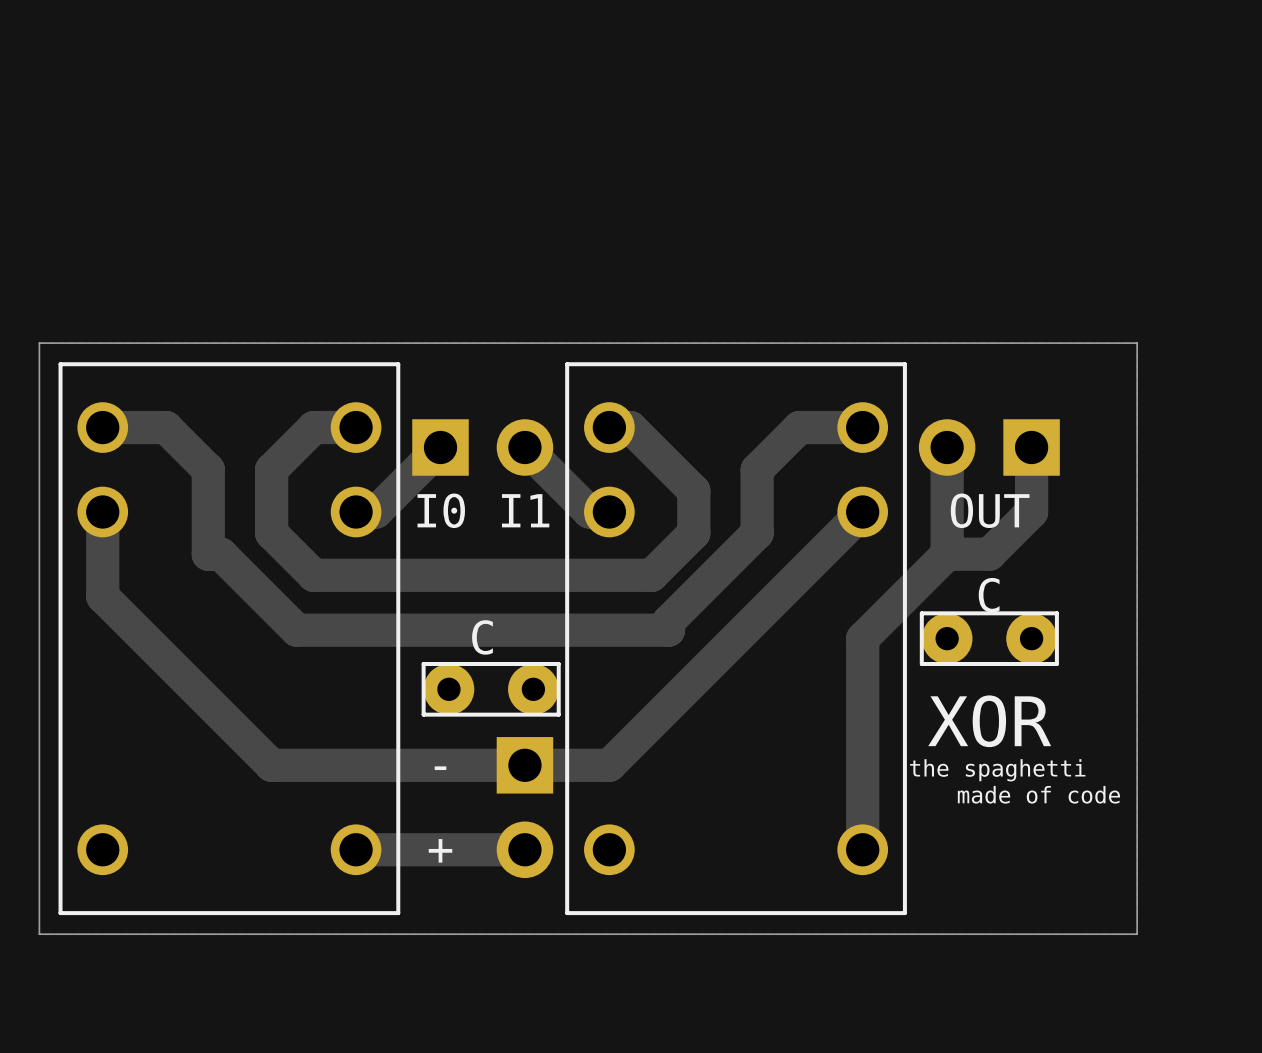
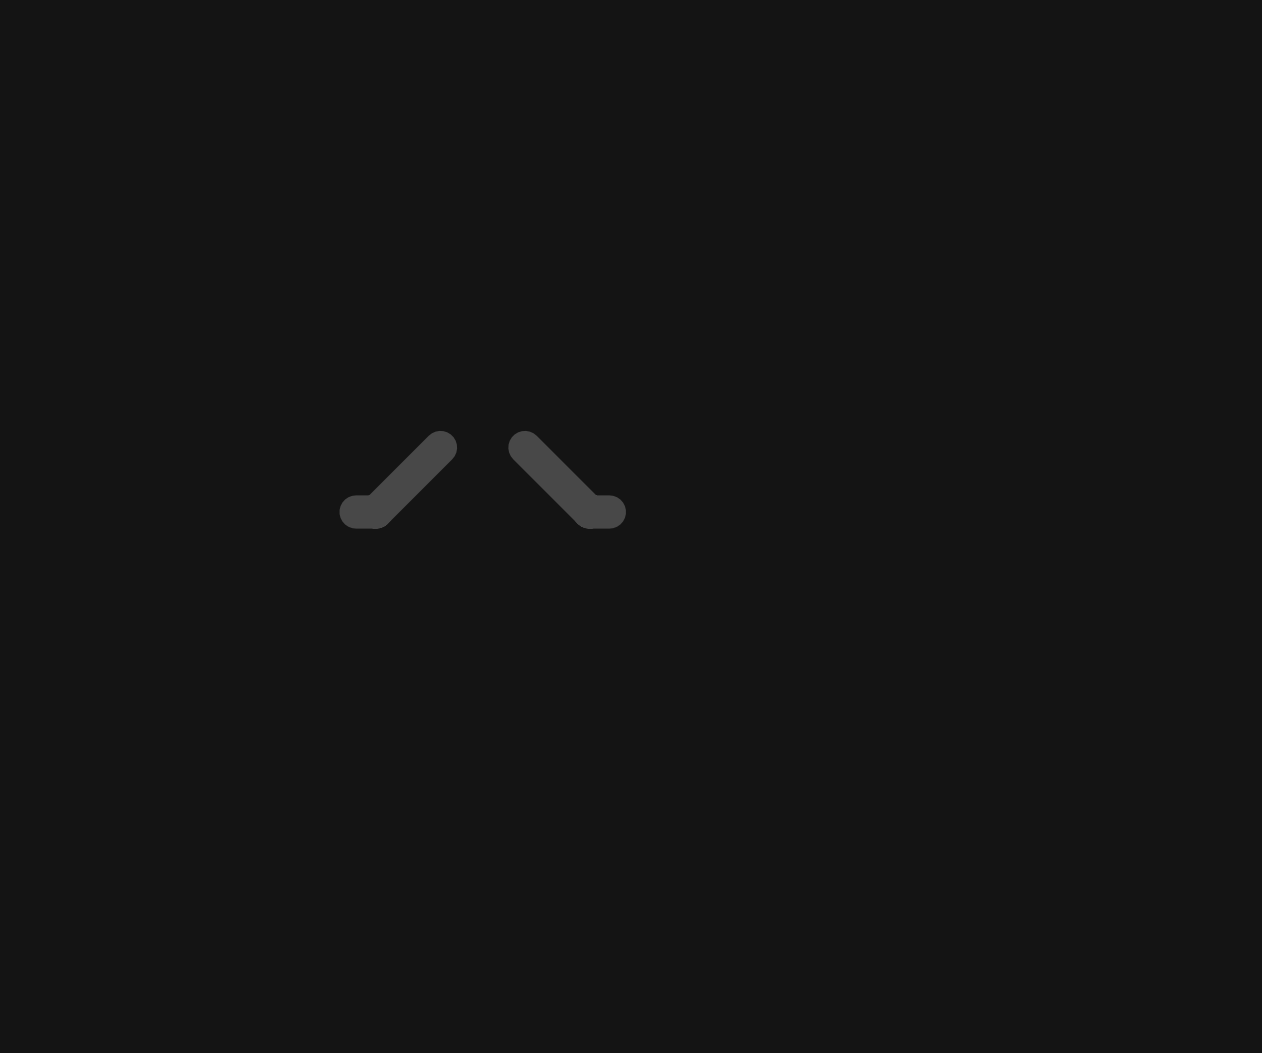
board edge: (39, 343) (39, 934) (1137, 934) (1137, 343) (39, 343) -> none
track: (102, 427) (166, 427) (208, 469) (208, 554) (220, 554) (296, 630) (668, 630) (668, 621) (757, 533) (757, 469) (799, 427) (862, 427) -> none
track: (356, 427) (313, 427) (271, 469) (271, 533) (313, 575) (651, 575) (693, 533) (693, 490) (630, 427) (609, 427) -> none
part: (482, 447) -> none
track: (947, 447) (947, 554) -> none
part: (989, 447) -> none
track: (1031, 447) (1031, 511) (989, 554) (947, 554) -> none
text: I0 (441, 510) -> none
text: I1 (525, 510) -> none
text: OUT (990, 510) -> none
track: (102, 511) (102, 596) (271, 765) (609, 765) (862, 511) -> none
track: (947, 554) (862, 638) (862, 849) -> none
text: C (989, 595) -> none
text: C (482, 637) -> none
part: (229, 638) -> none
part: (736, 638) -> none
part: (989, 638) -> none
part: (491, 689) -> none
text: XOR (989, 721) -> none
text: - (440, 768) -> none
text: the spaghetti (997, 770) -> none
text: made of code (1038, 794) -> none
part: (524, 807) -> none
track: (356, 849) (524, 849) -> none
text: + (440, 850) -> none

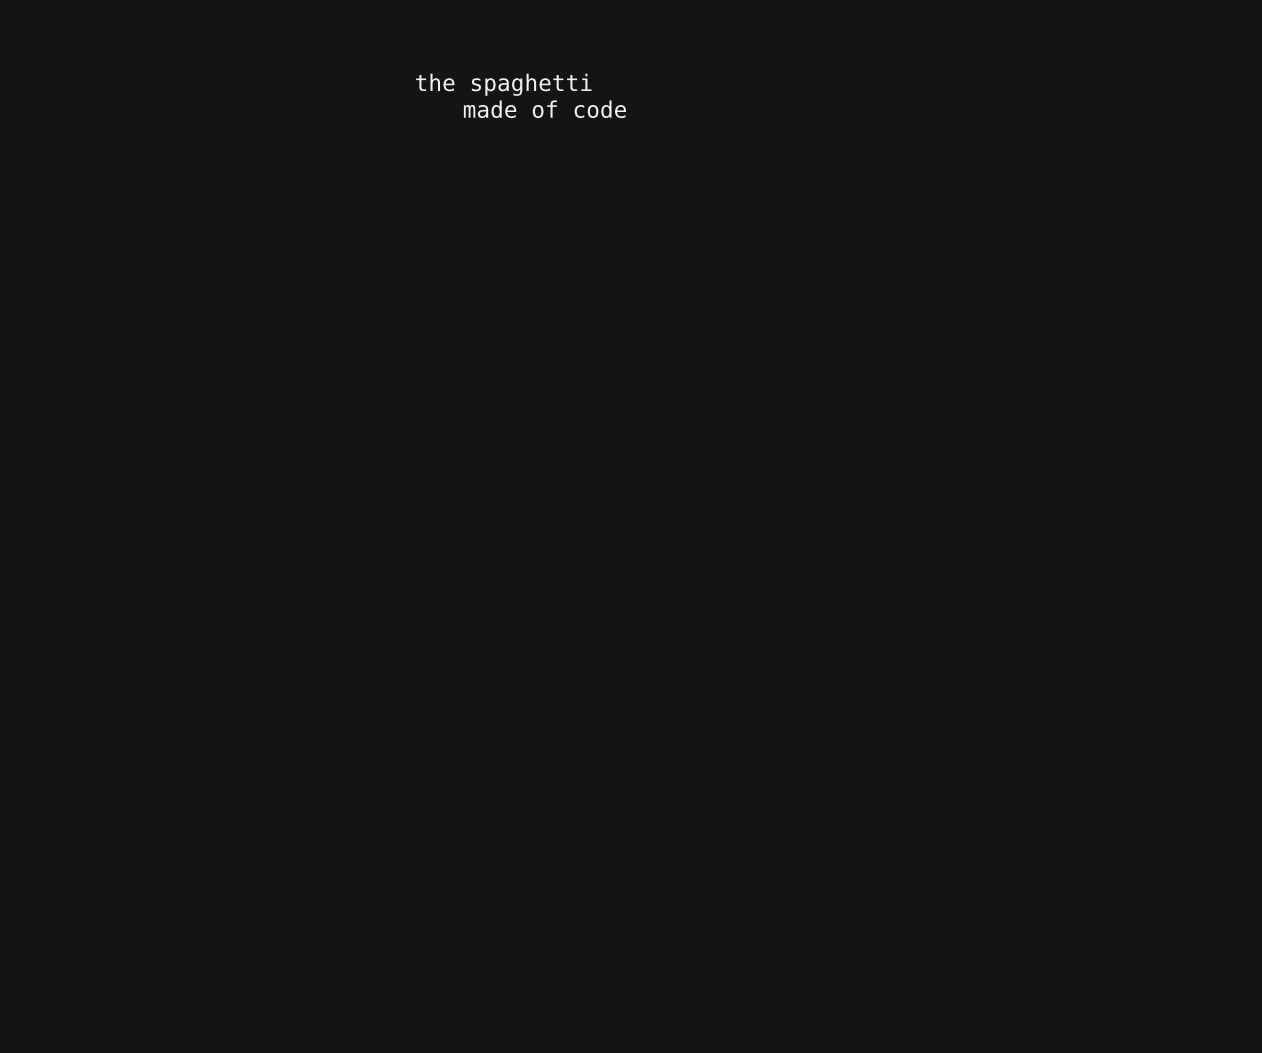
text: none -> the spaghetti (503, 84)
text: none -> made of code (544, 109)
track: (440, 447) (376, 511) (356, 511) -> none
track: (524, 447) (589, 511) (609, 511) -> none

